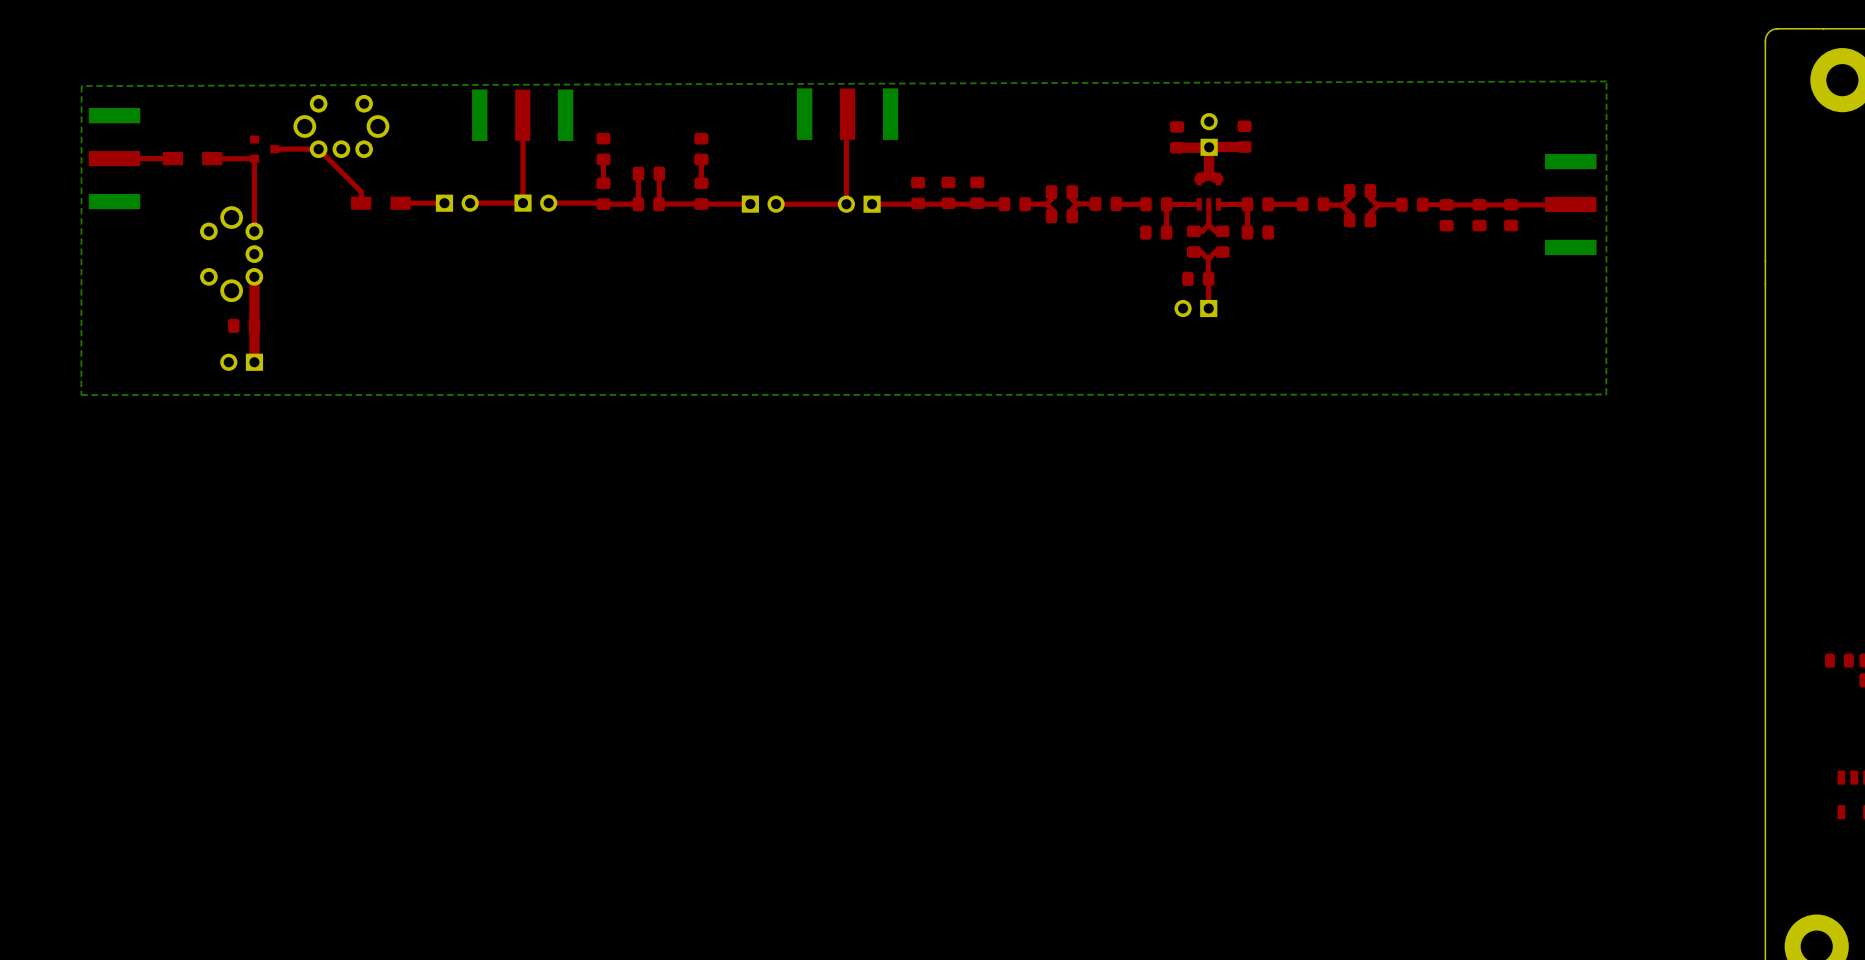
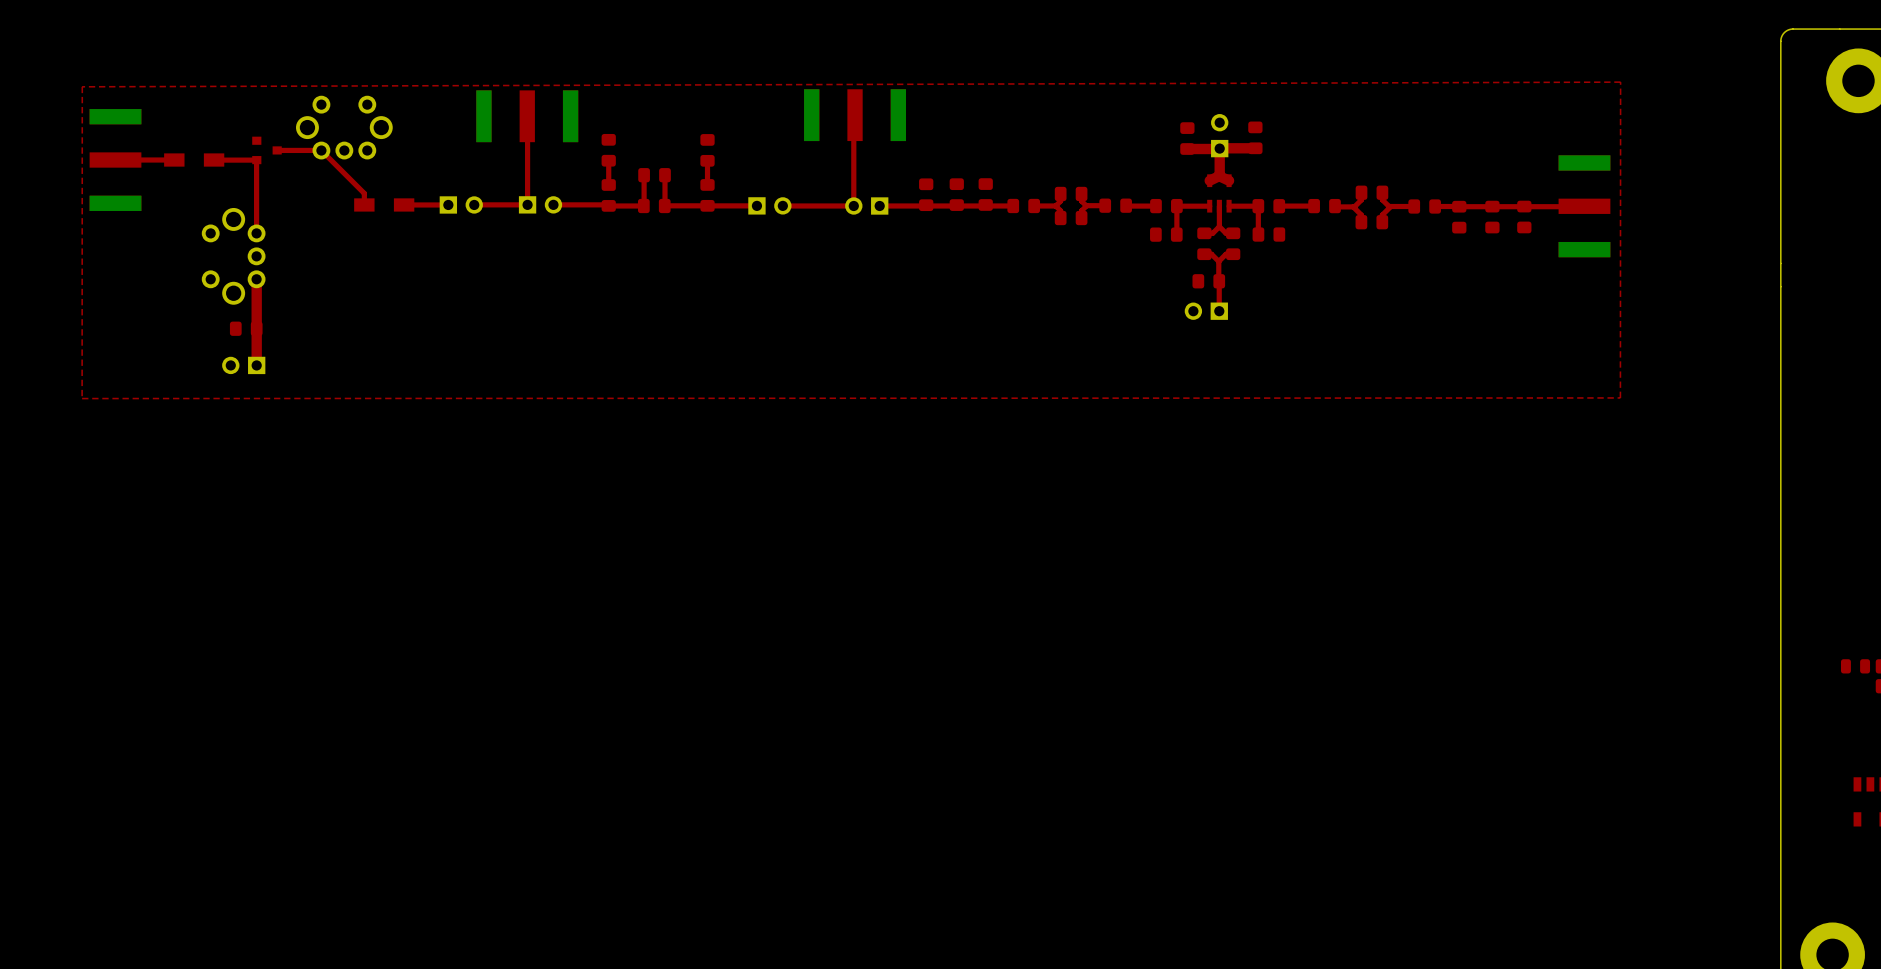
bottom zone outline: (1606, 81) (81, 86) (81, 395) (1606, 394) (1606, 81) -> none

